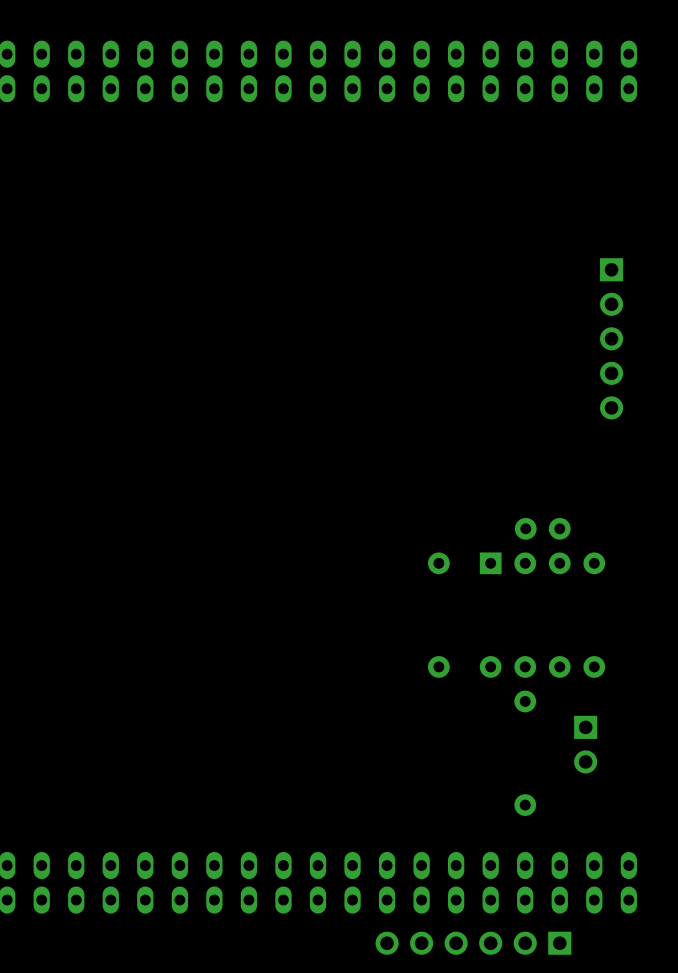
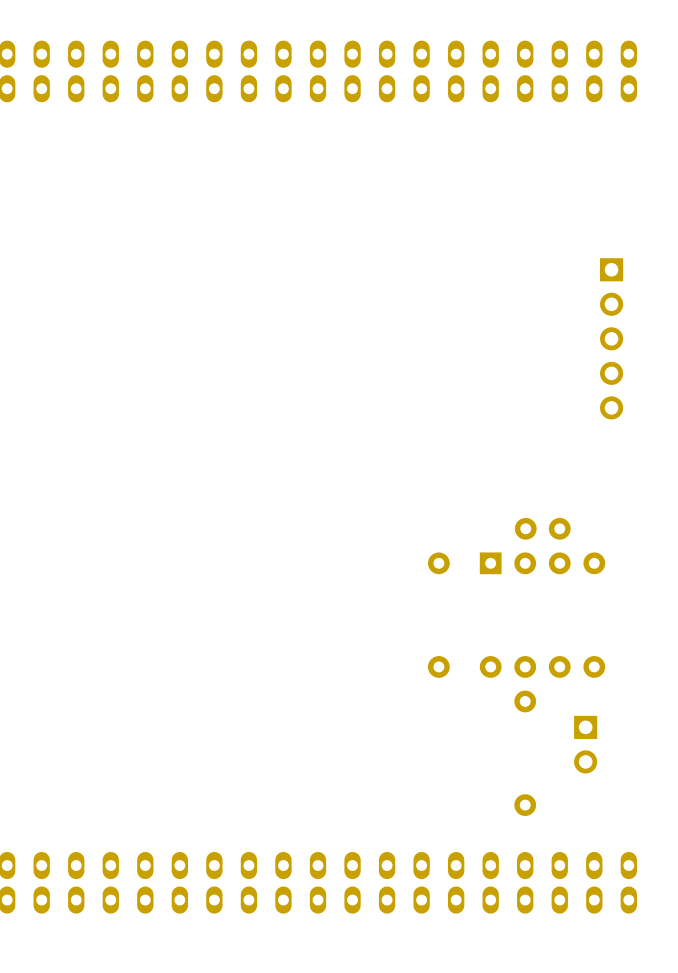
part: (473, 943) -> none

